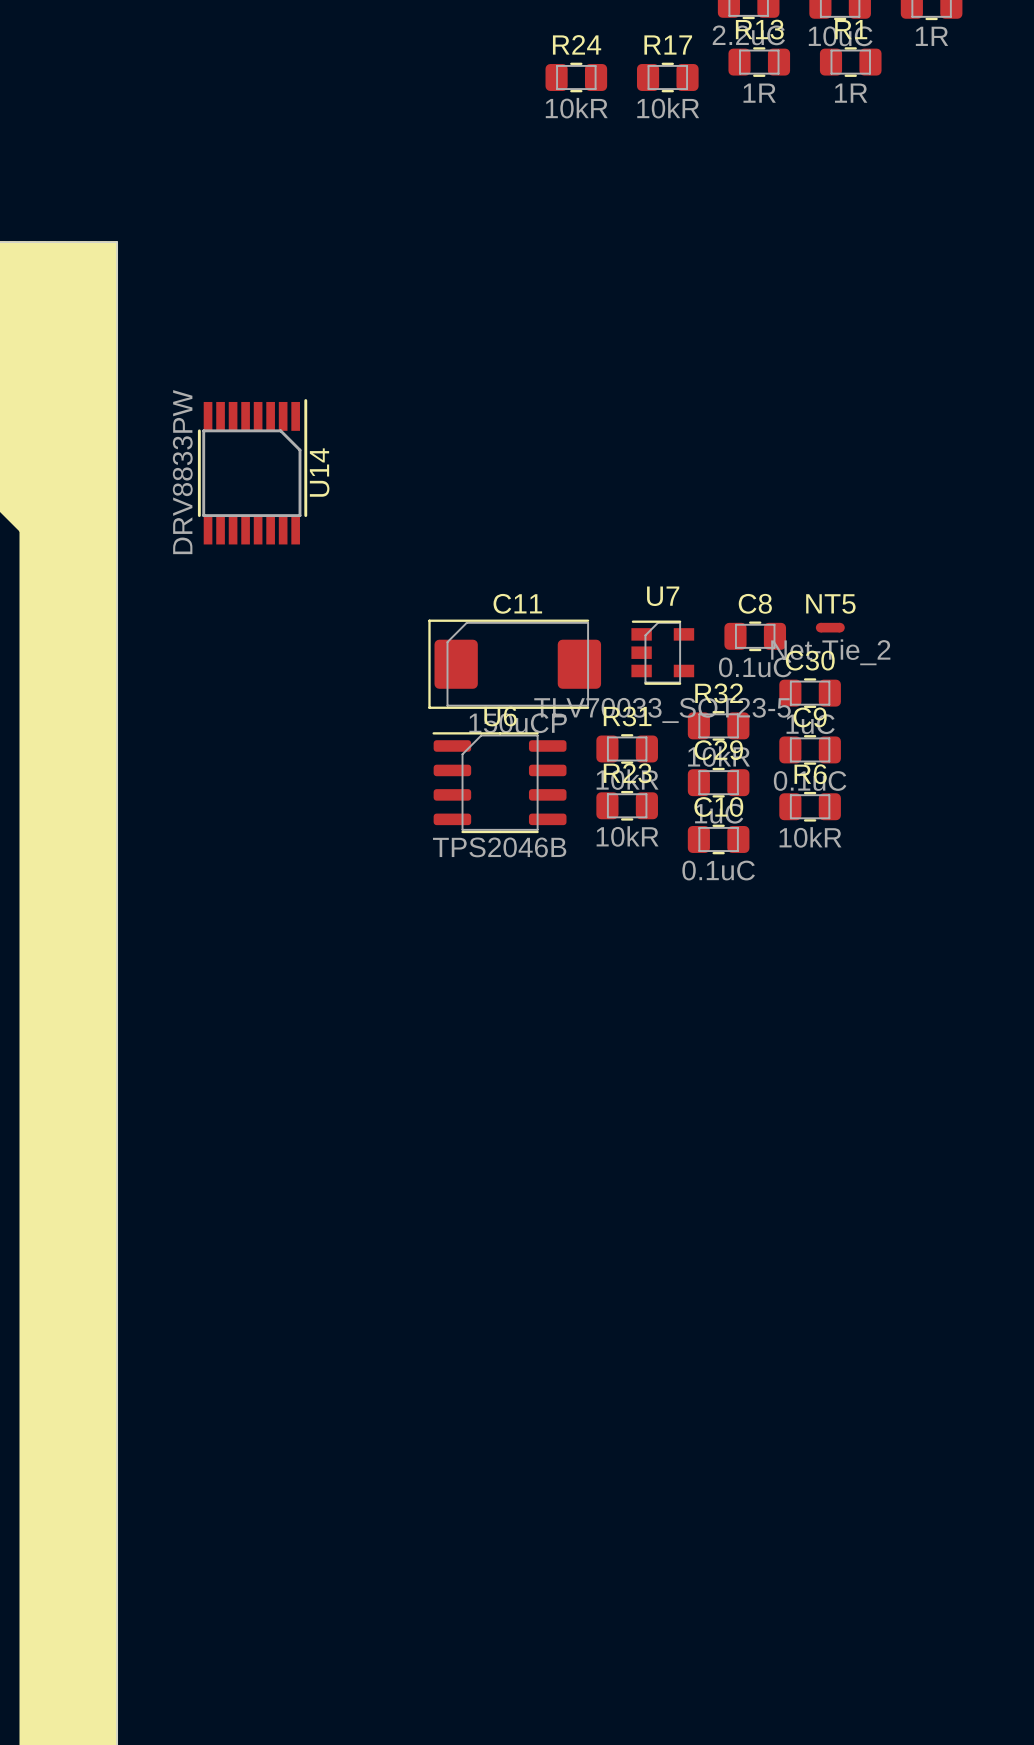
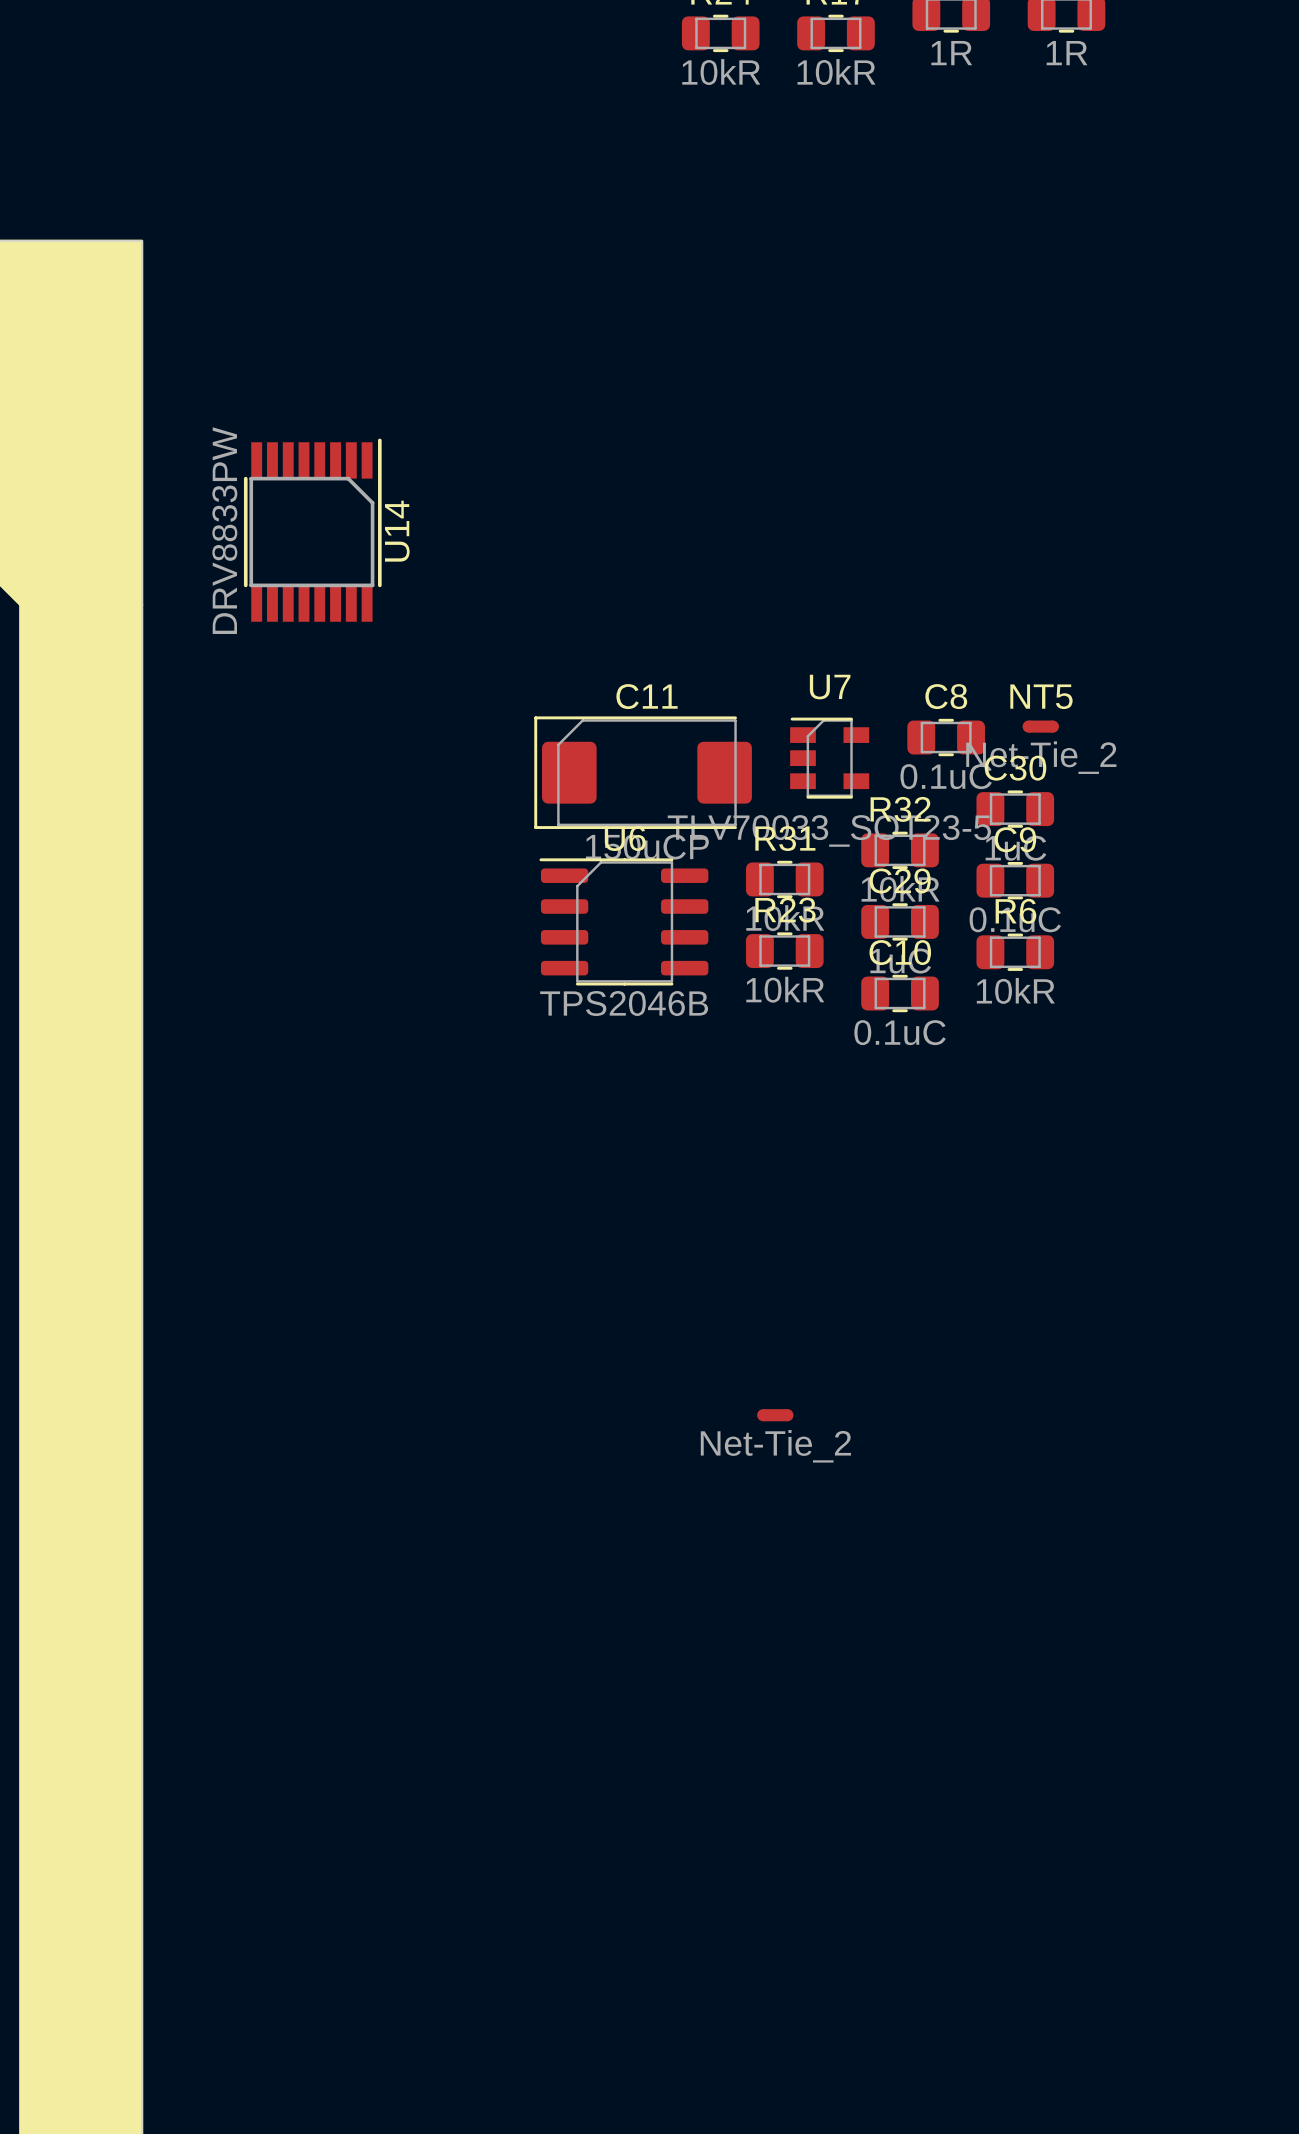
part: none -> Net-Tie_2 (775, 1415)

